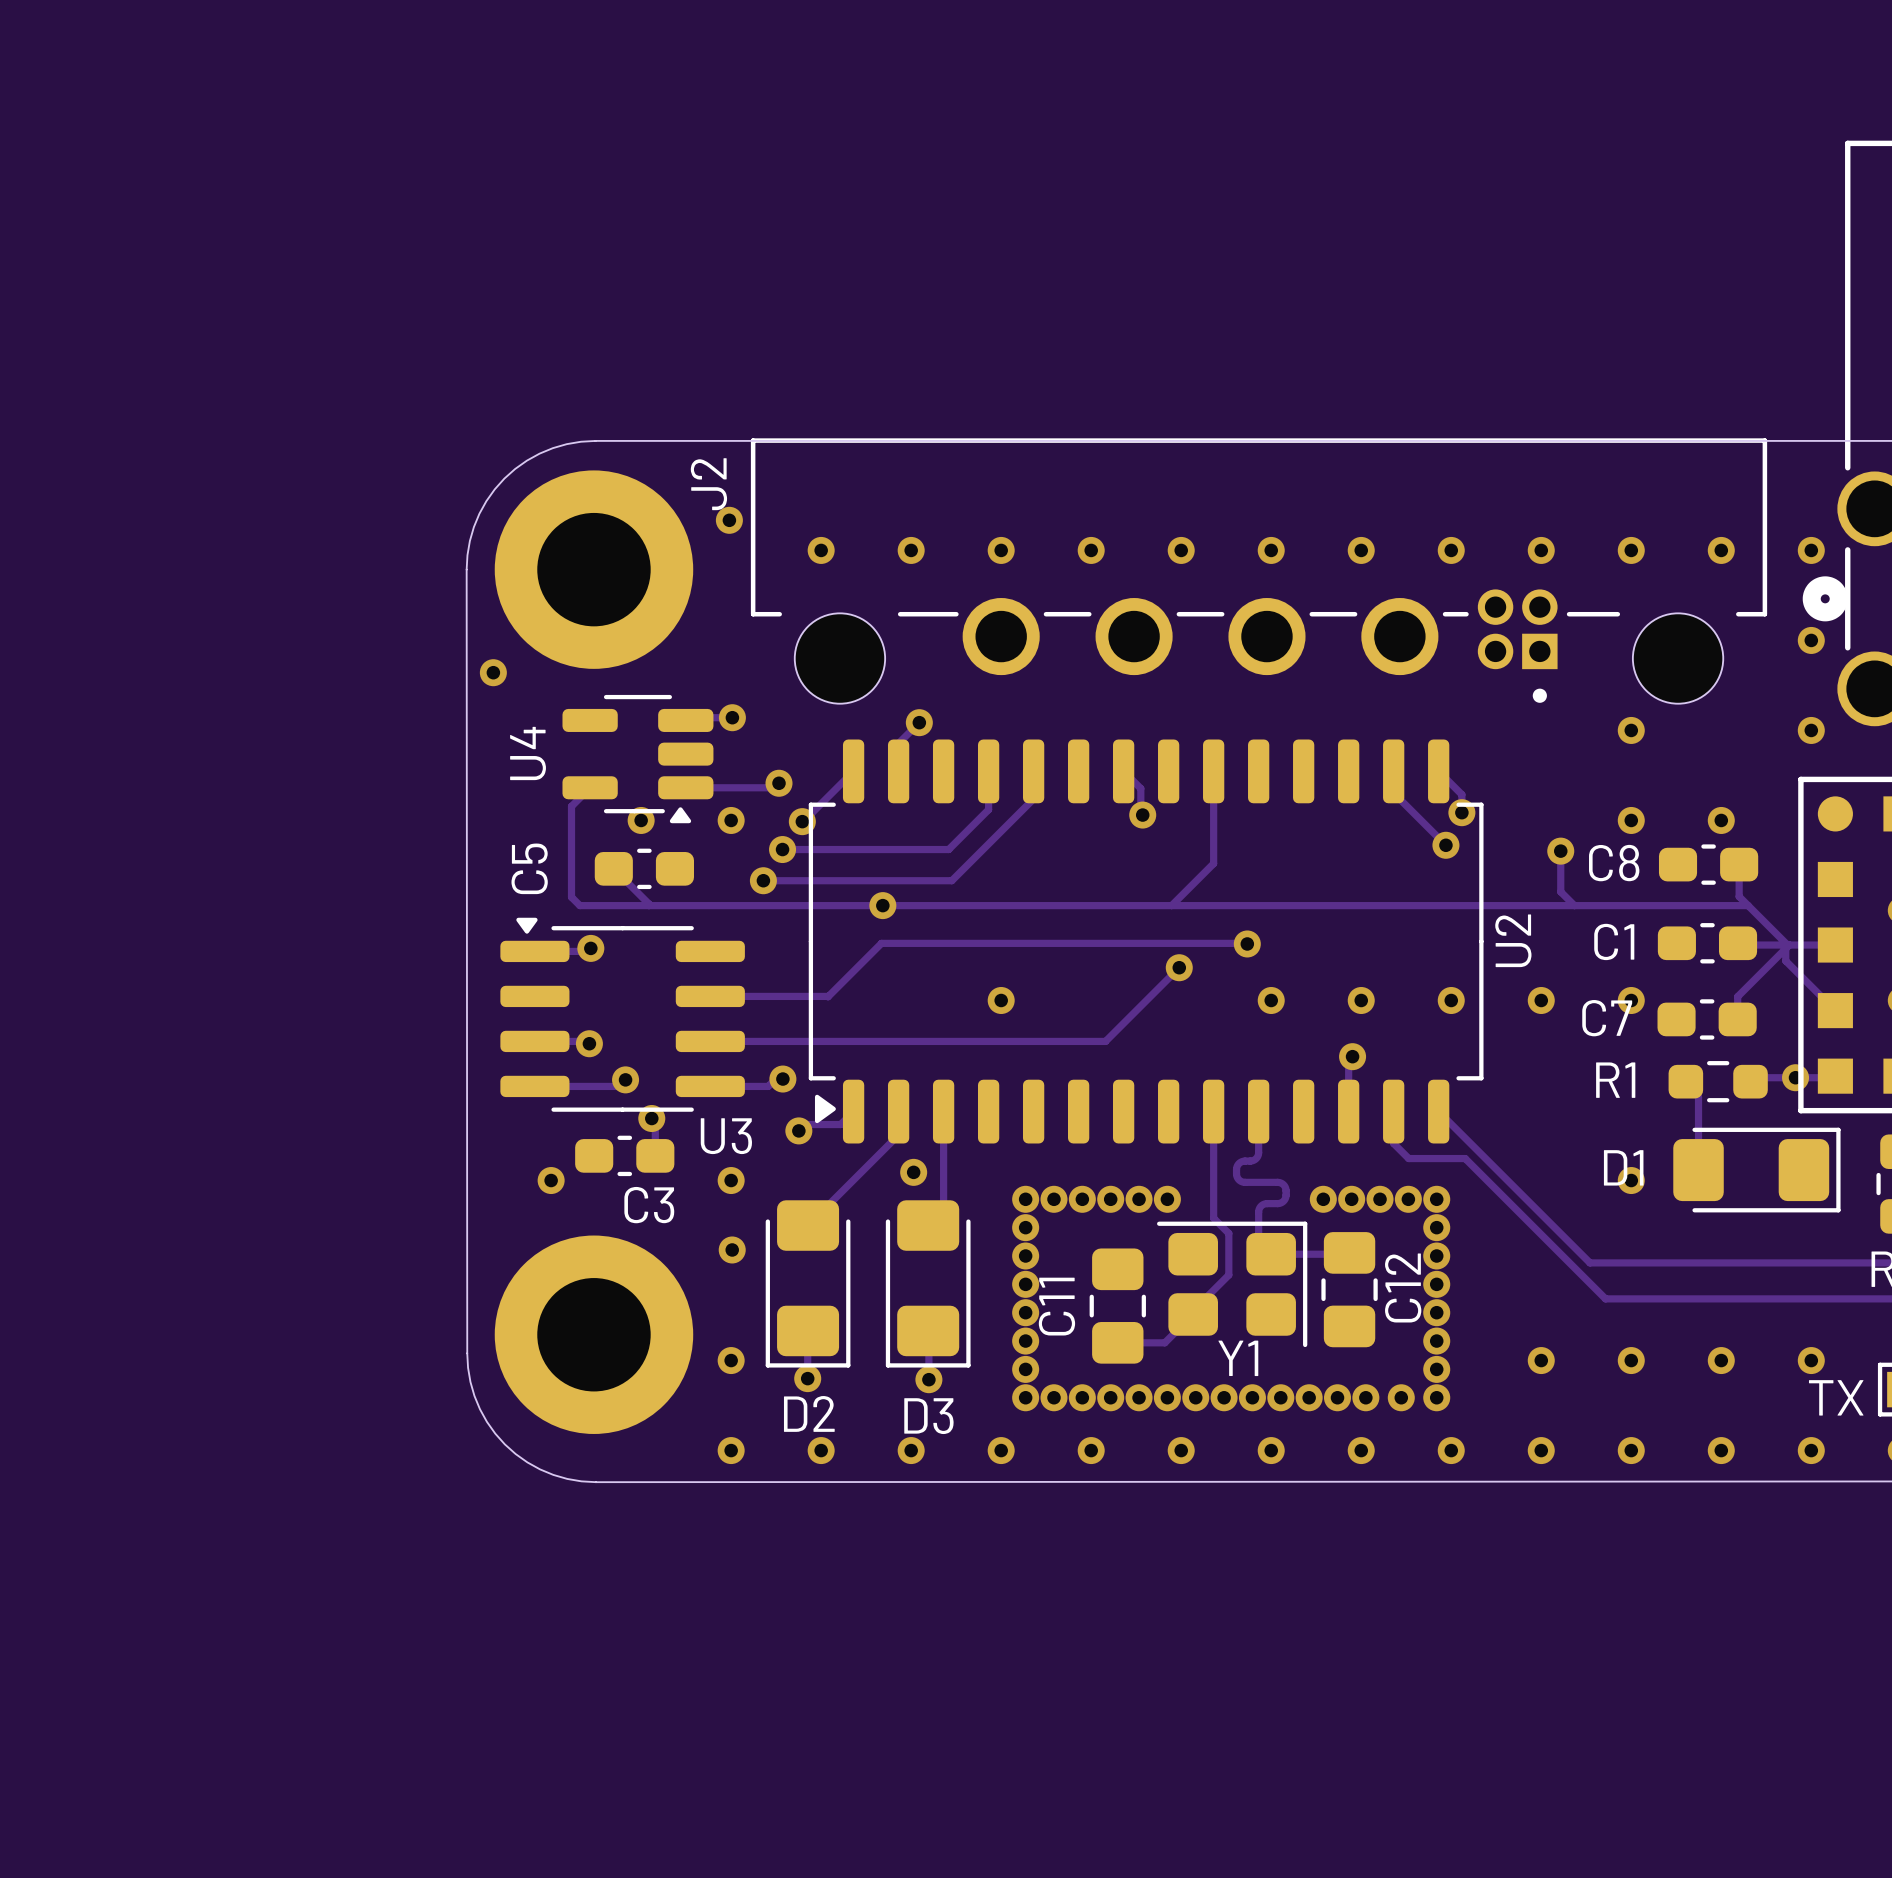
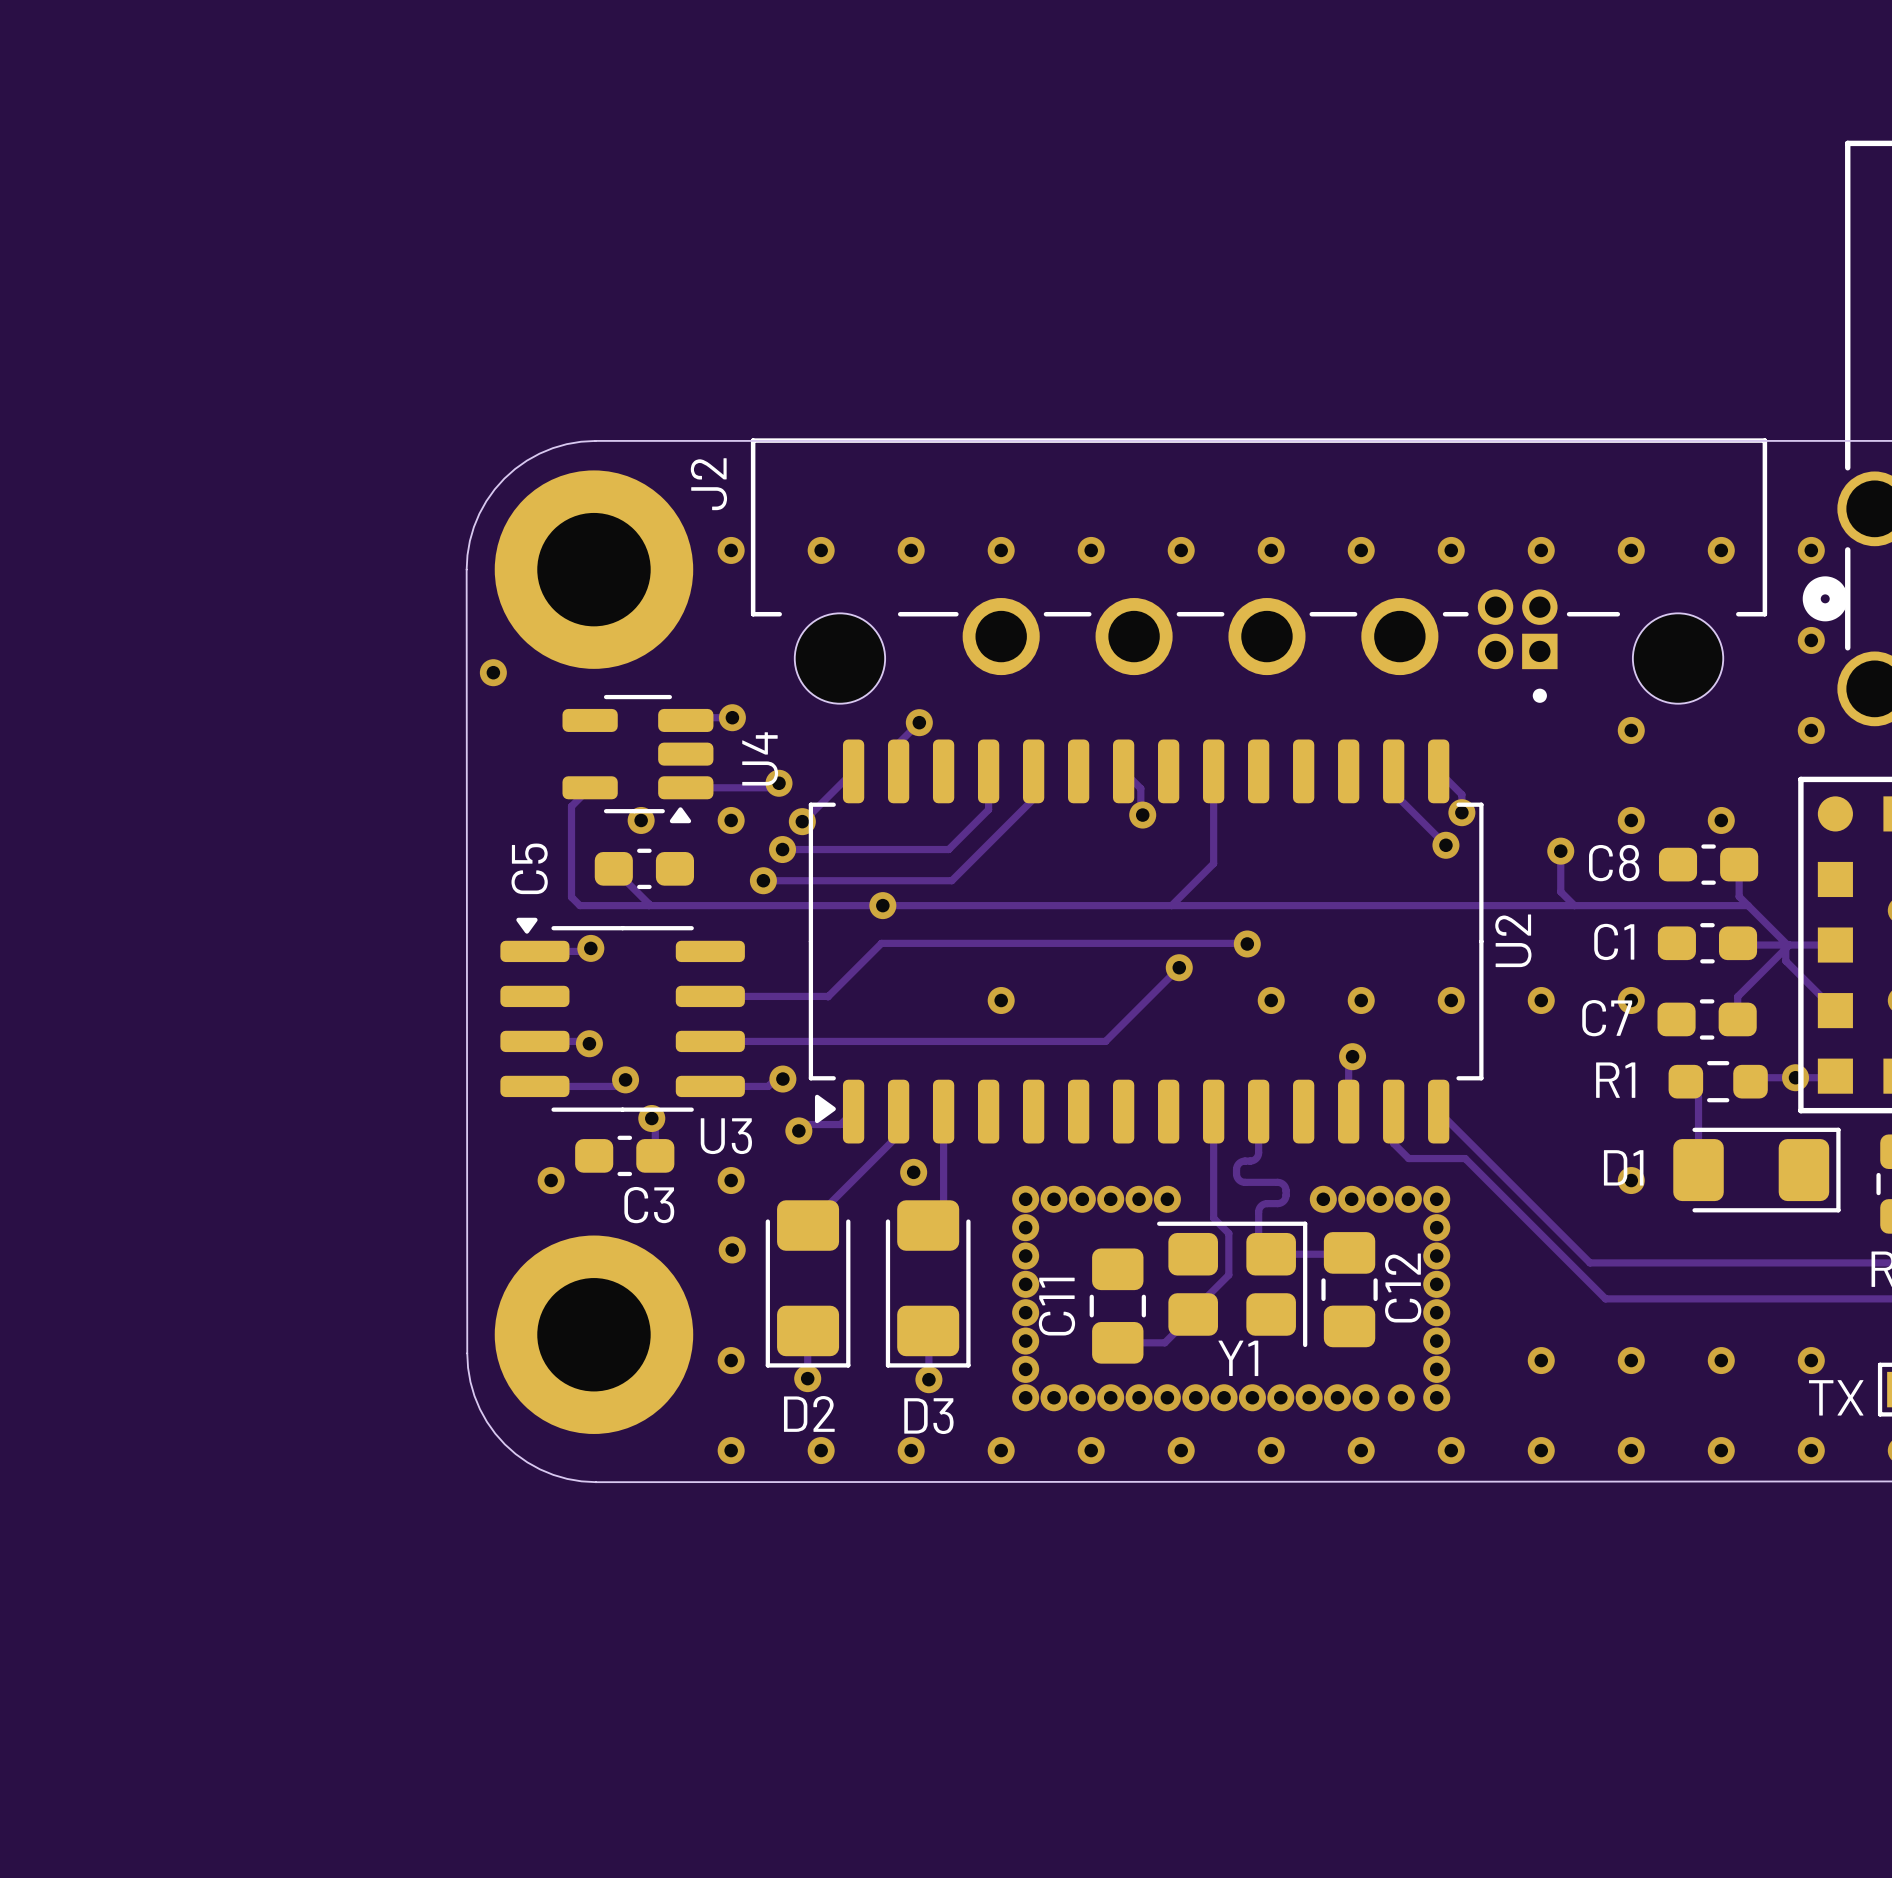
via position: (729, 520) -> (731, 550)
U4 name position: U4 (528, 753) -> U4 (760, 758)

